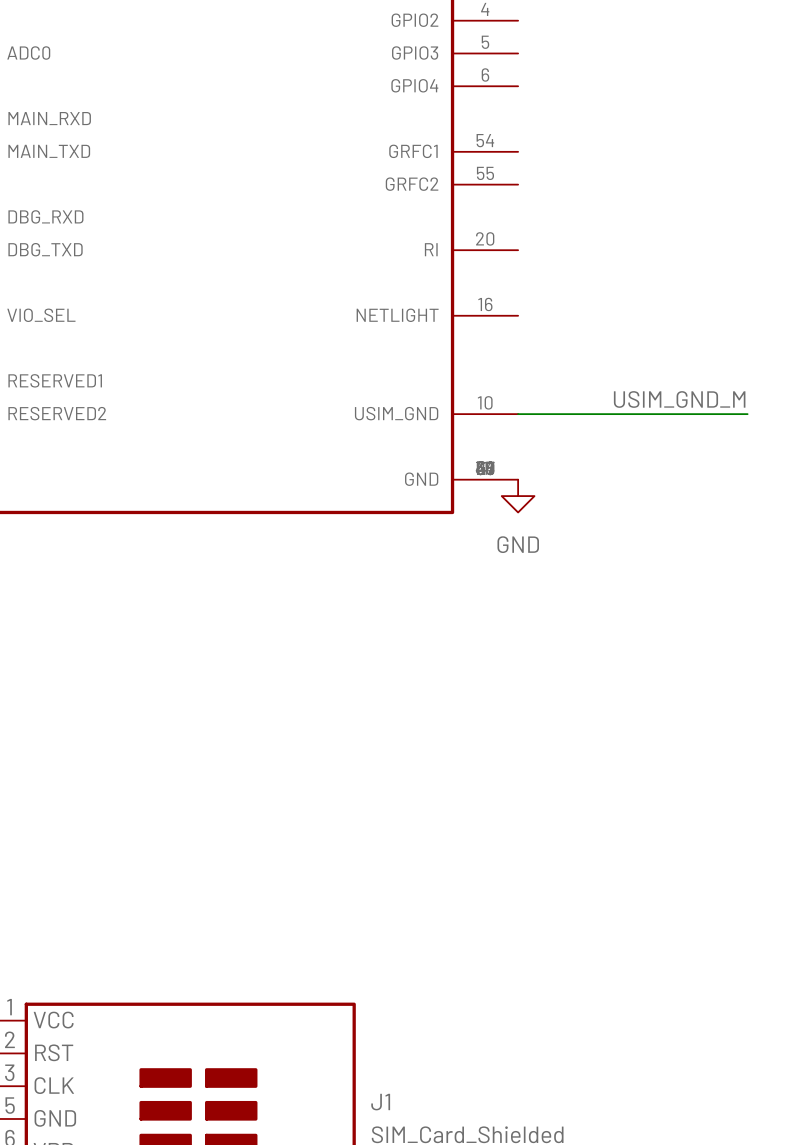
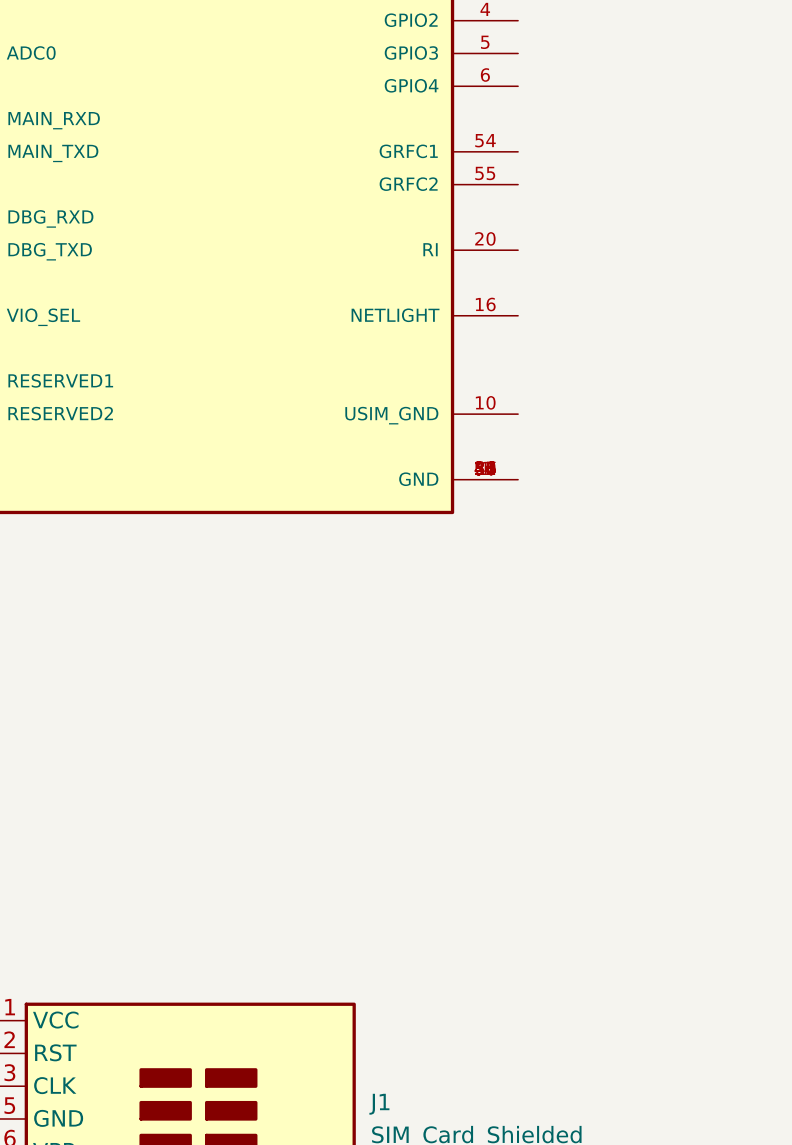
label: USIM_GND_M (679, 399) -> none
wire: (518, 414) (747, 414) -> none
power symbol: GND (518, 496) -> none

